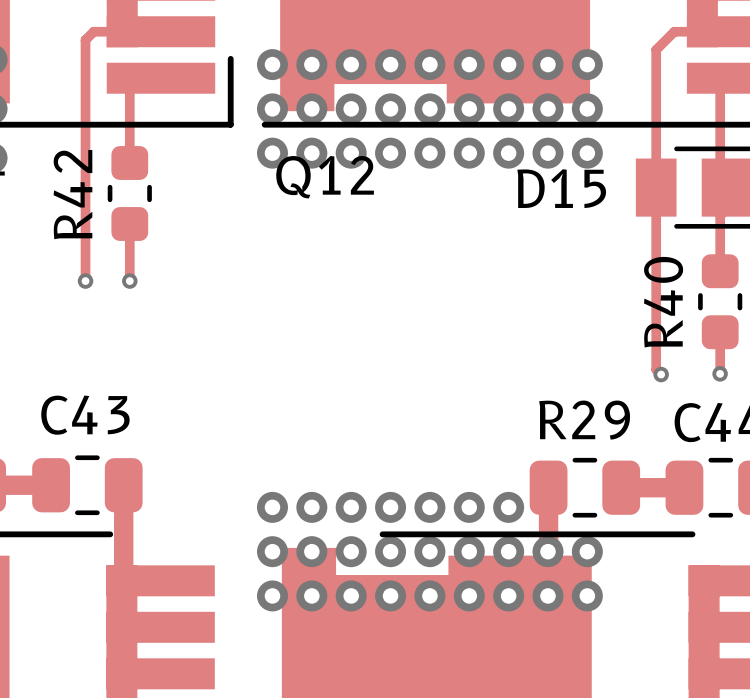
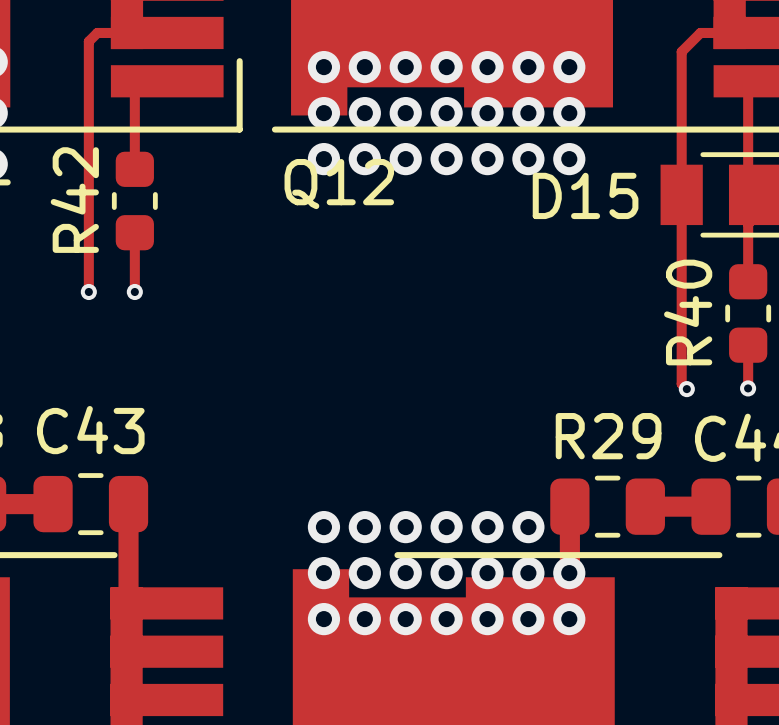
via: (272, 64) -> none
via: (587, 64) -> none
via: (272, 108) -> none
via: (587, 108) -> none
via: (272, 153) -> none
via: (587, 153) -> none
via: (272, 507) -> none
via: (272, 551) -> none
via: (587, 551) -> none
via: (272, 595) -> none
via: (587, 595) -> none

